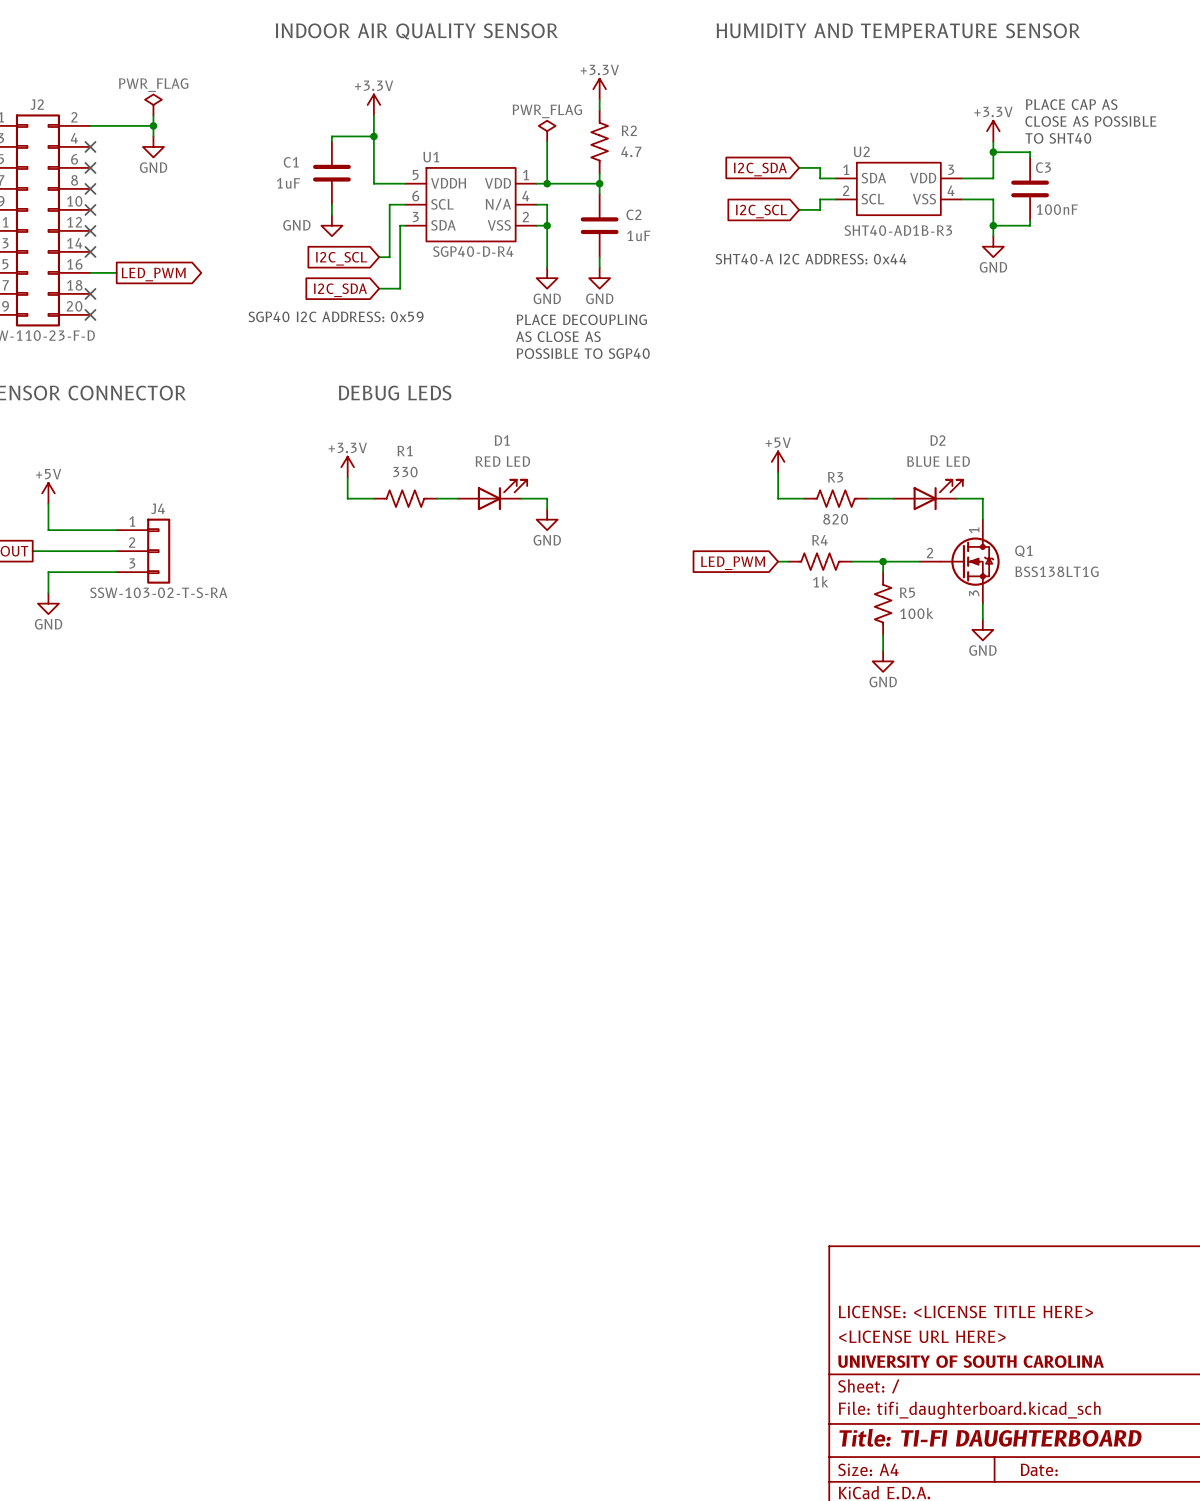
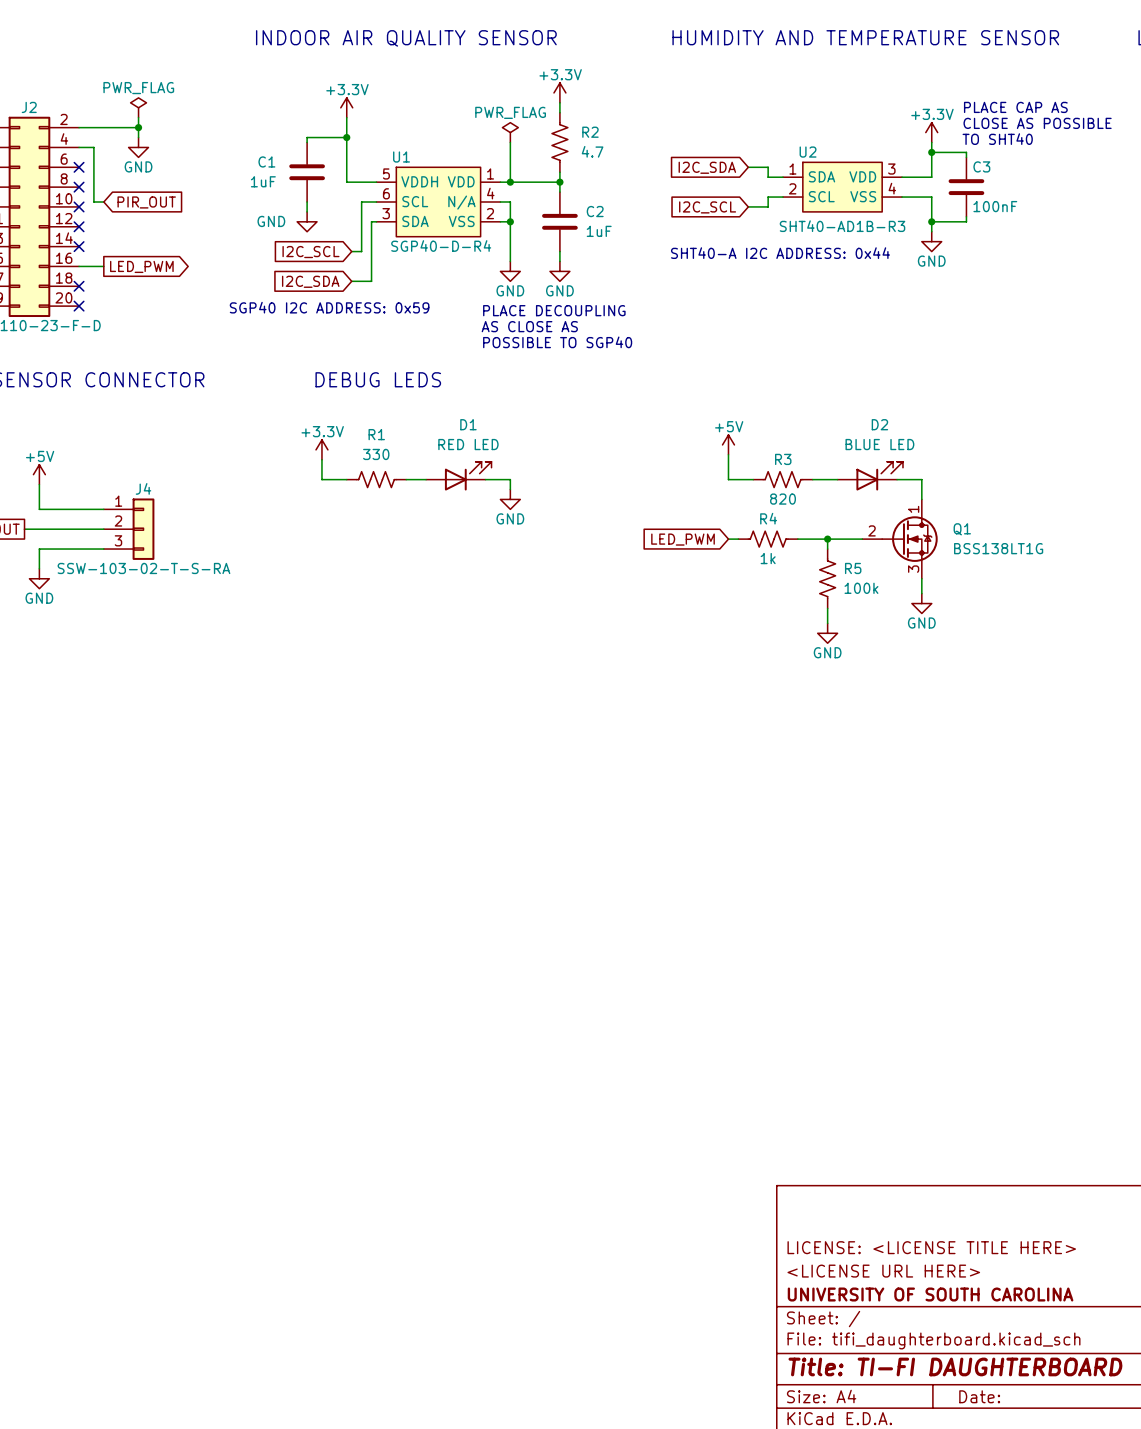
wire: none -> (79, 147) (93, 147) (93, 201) (103, 201)
no-connect mark: (90, 146) -> none
global label: none -> PIR_OUT (146, 202)

